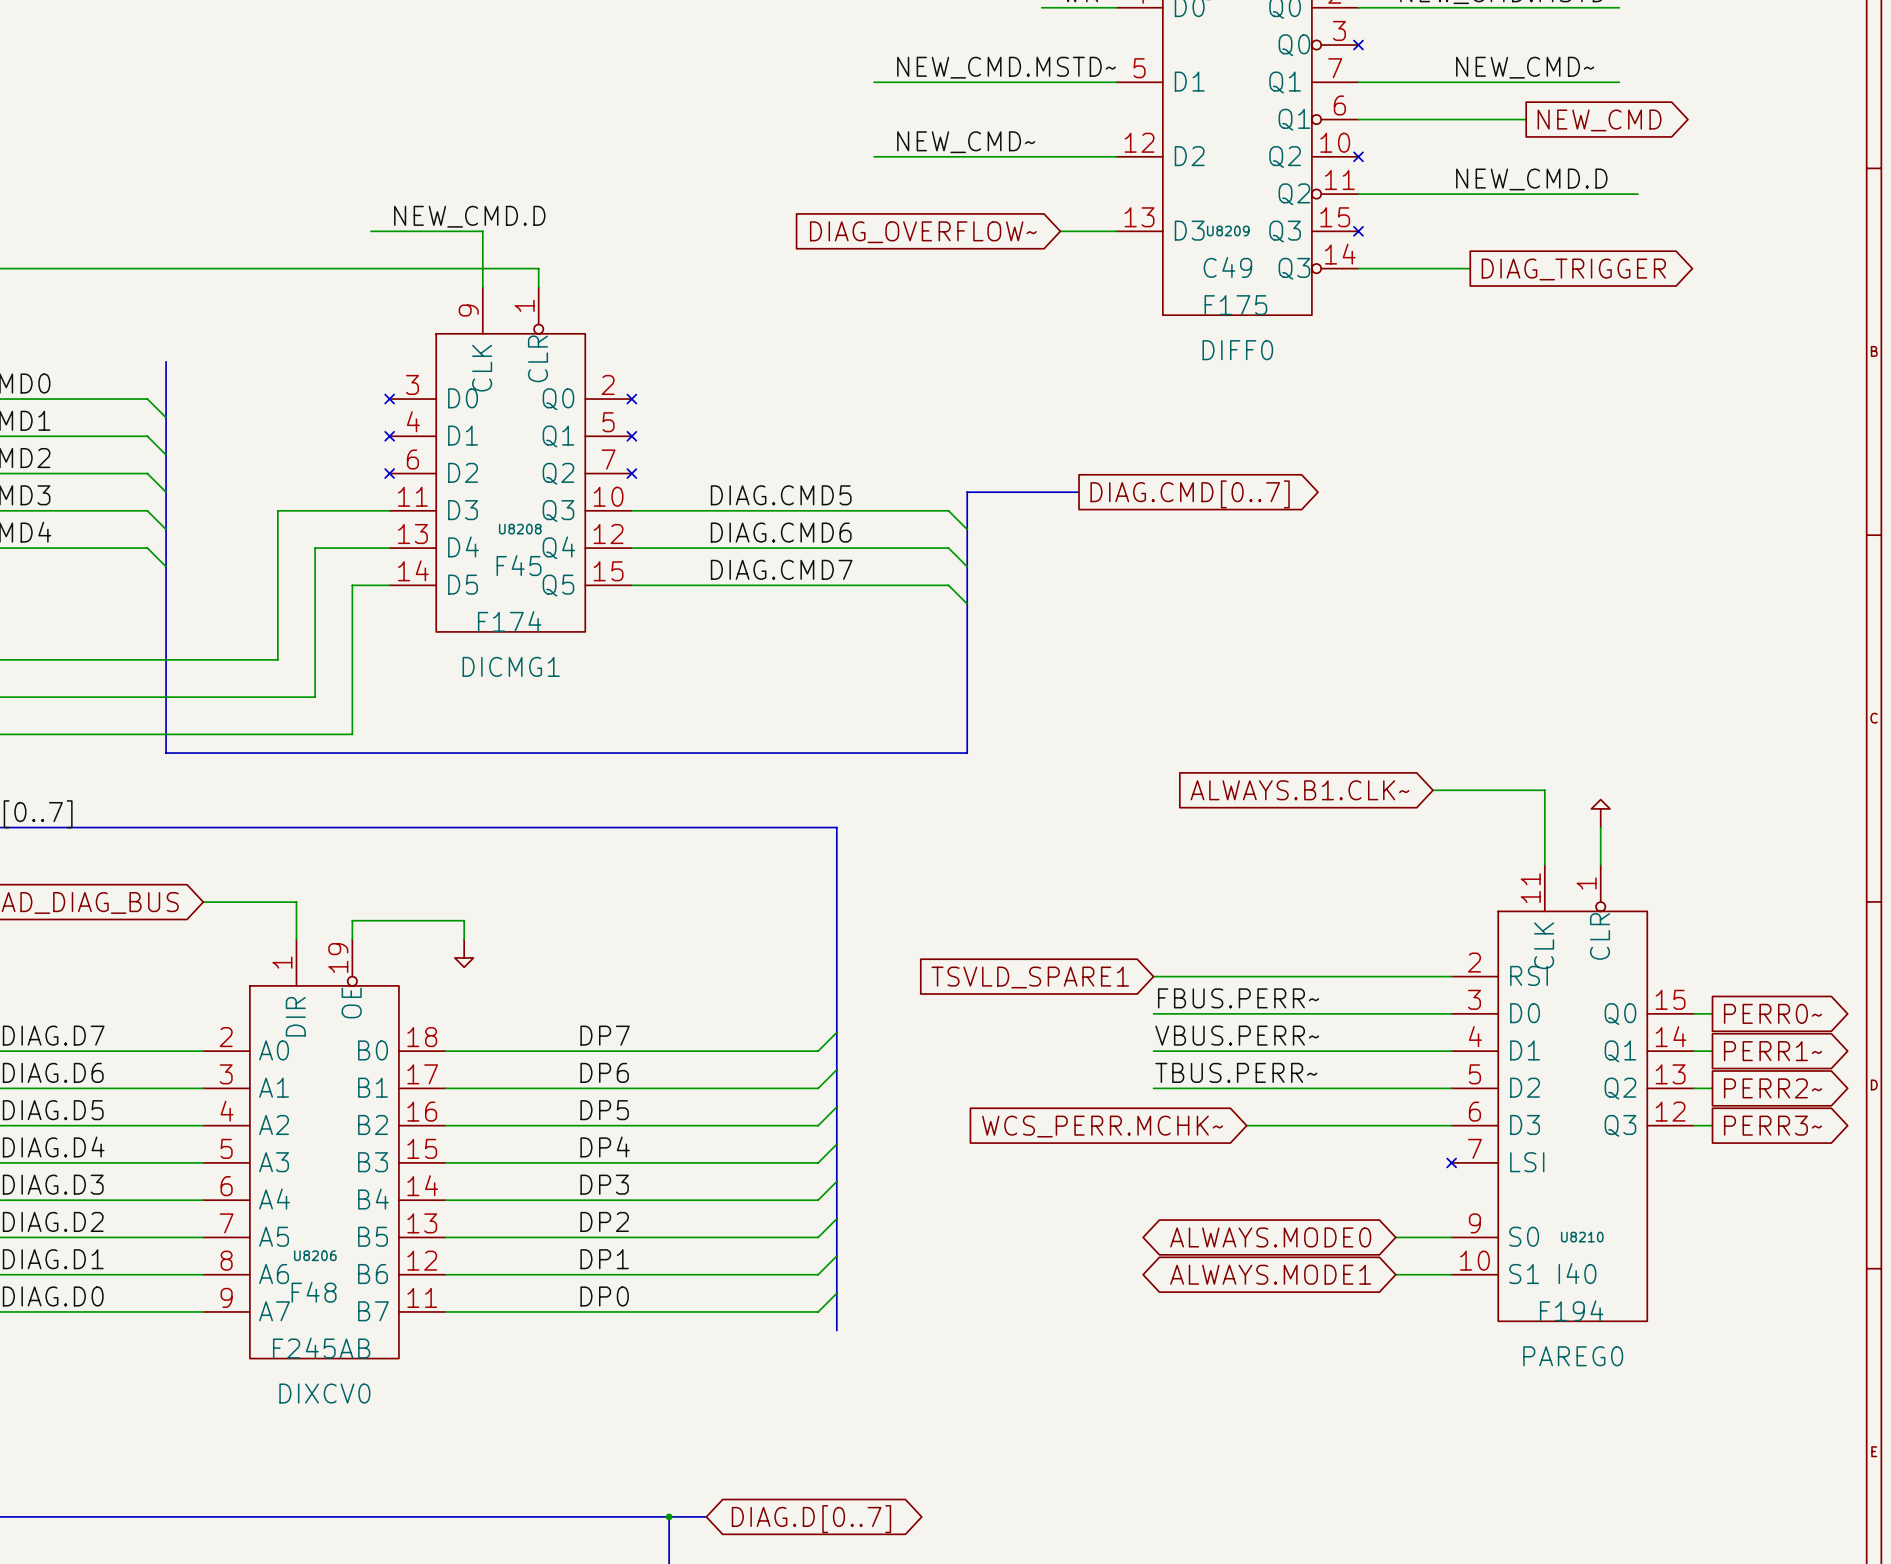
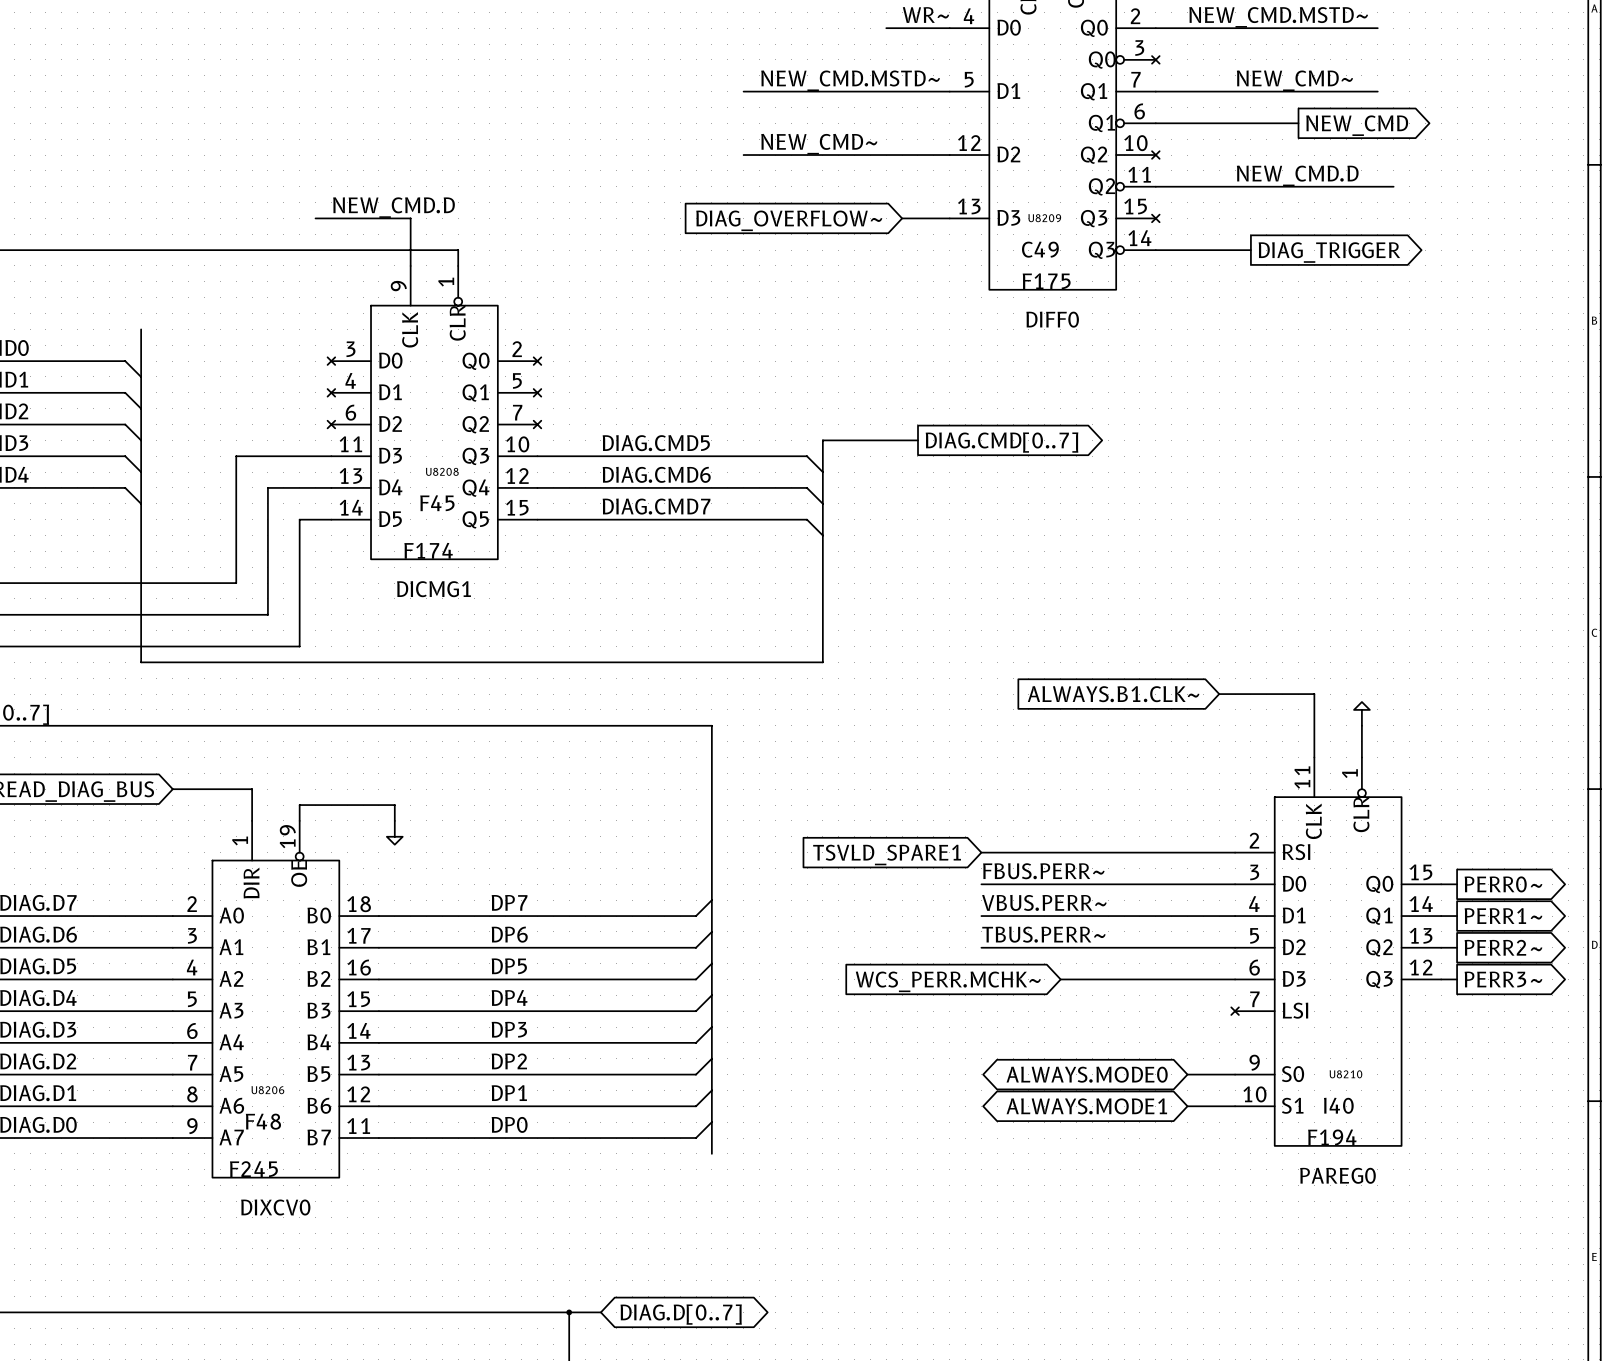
U8206 value: F245AB (321, 1348) -> F245 (253, 1169)

